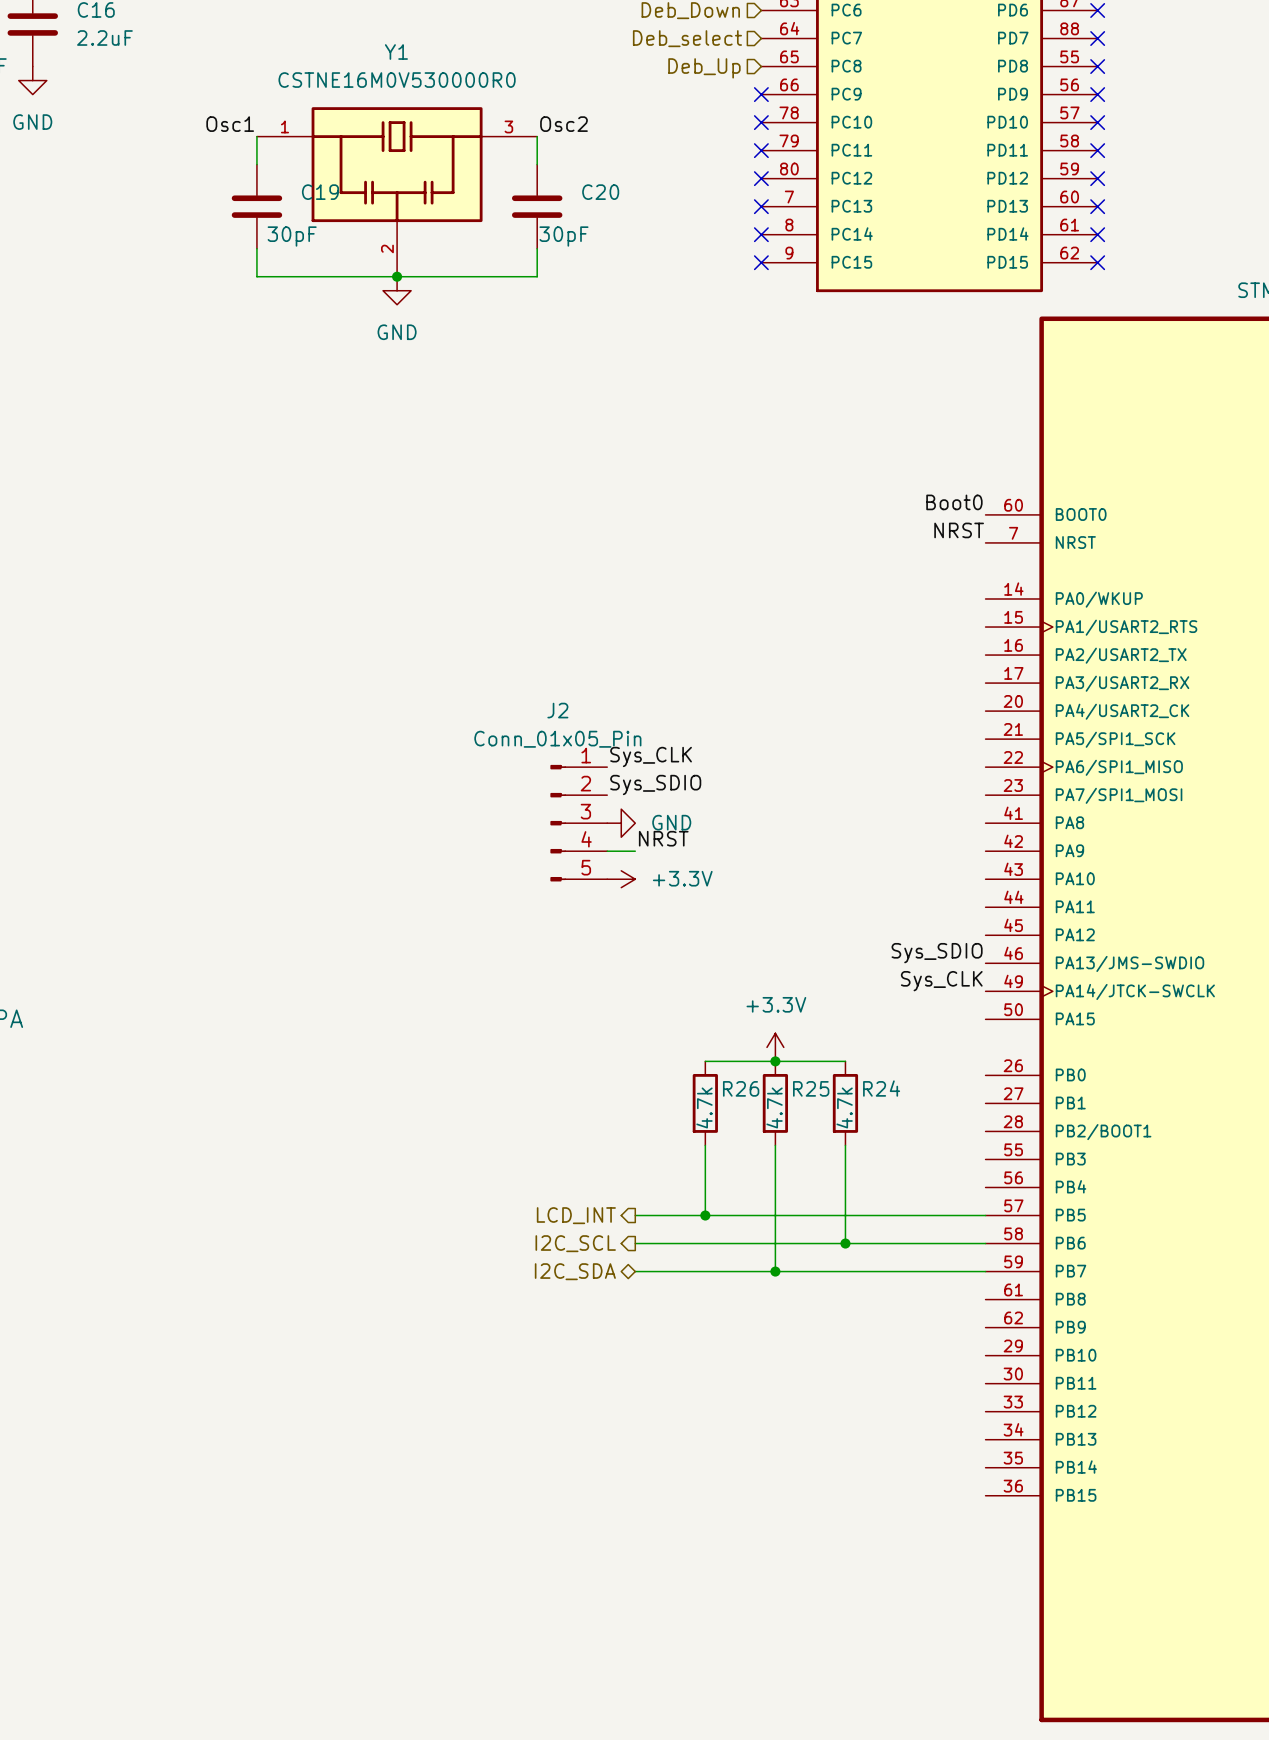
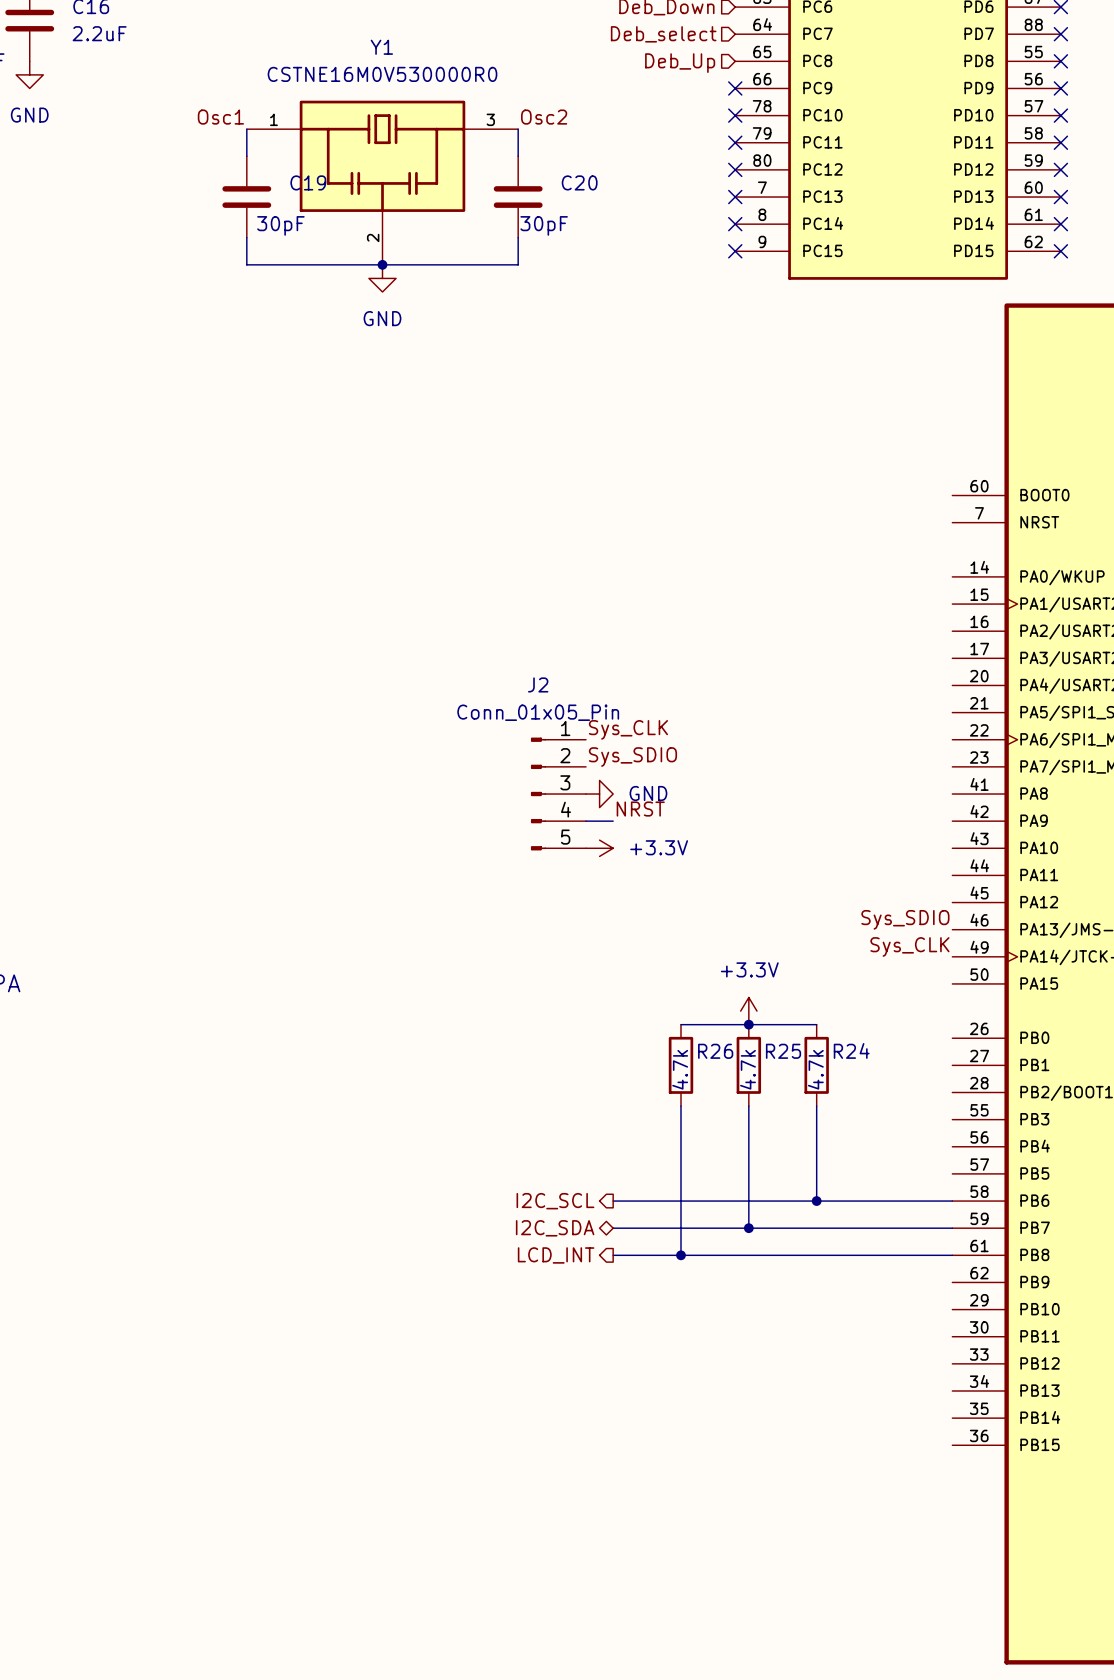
label: Boot0 (954, 502) -> none
label: NRST (959, 530) -> none
hierarchical label position: LCD_INT (576, 1215) -> LCD_INT (556, 1255)
wire: (635, 1215) (985, 1215) -> (613, 1255) (952, 1255)
wire: none -> (680, 1173) (680, 1255)
junction: (705, 1215) -> none
junction: none -> (680, 1255)

